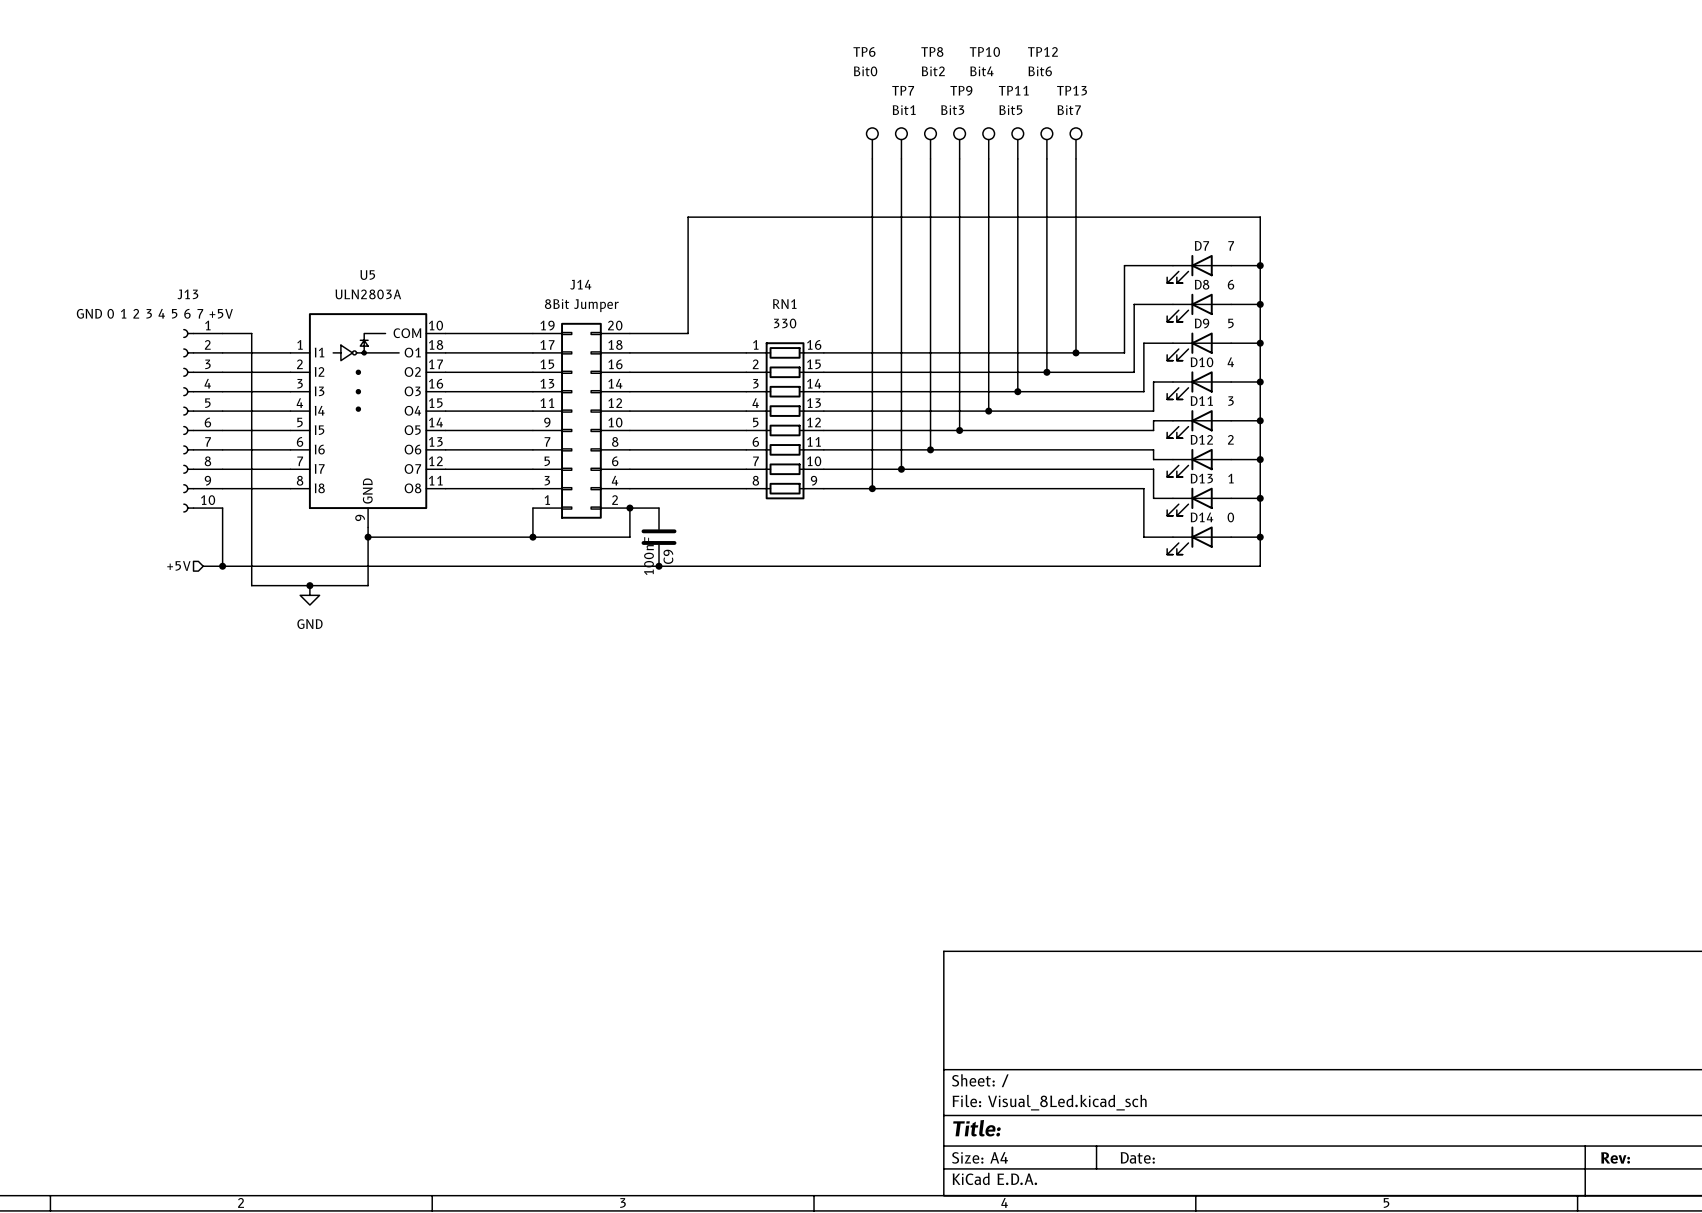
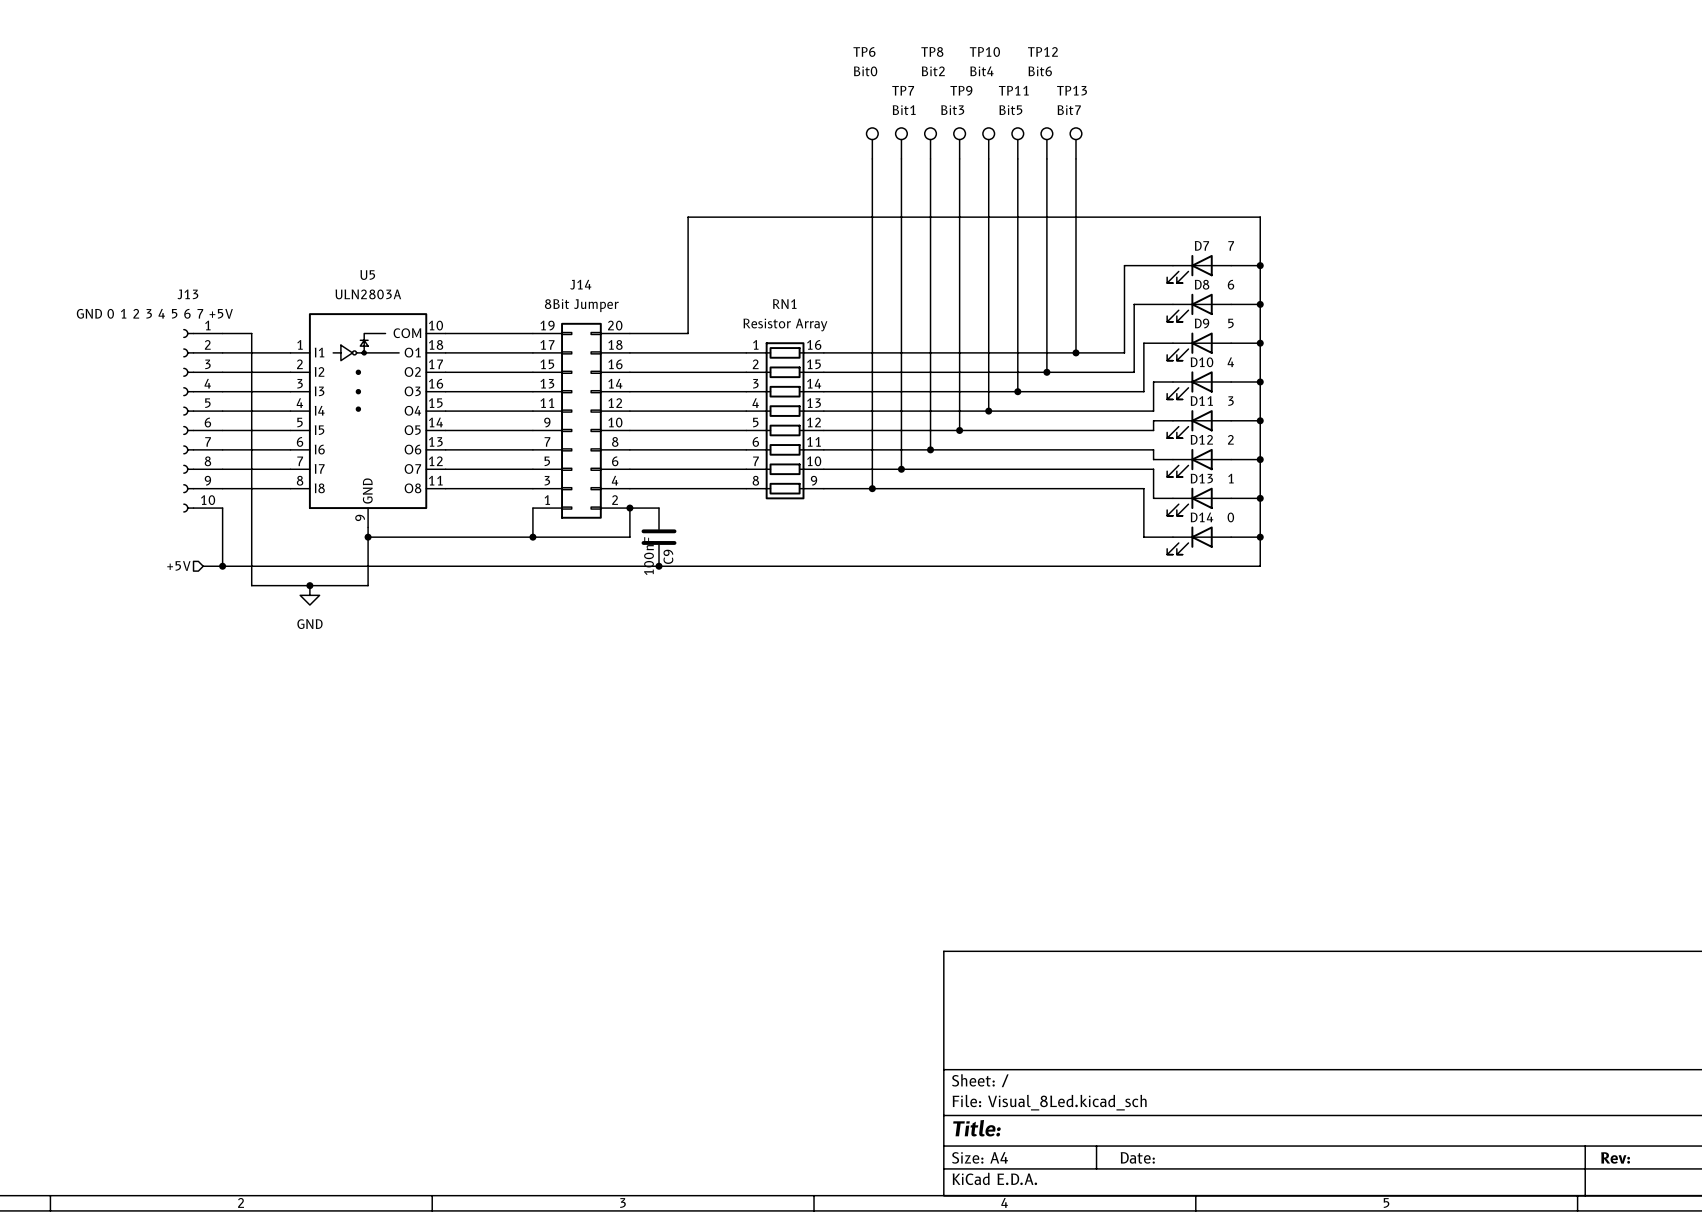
RN1 value: 330 (785, 323) -> Resistor Array (785, 324)

